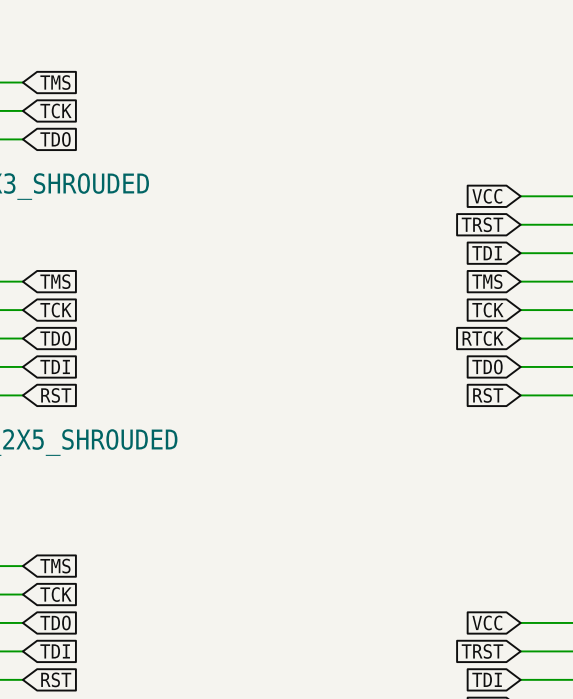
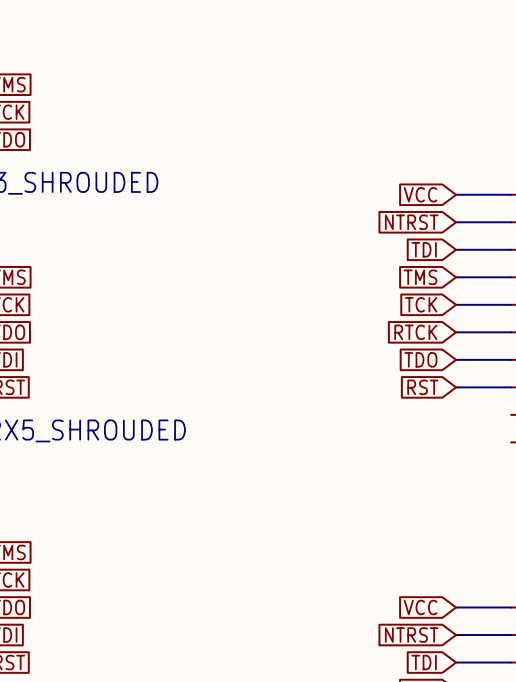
global label: TRST (482, 224) -> NTRST (411, 222)
global label: TRST (482, 651) -> NTRST (411, 635)

